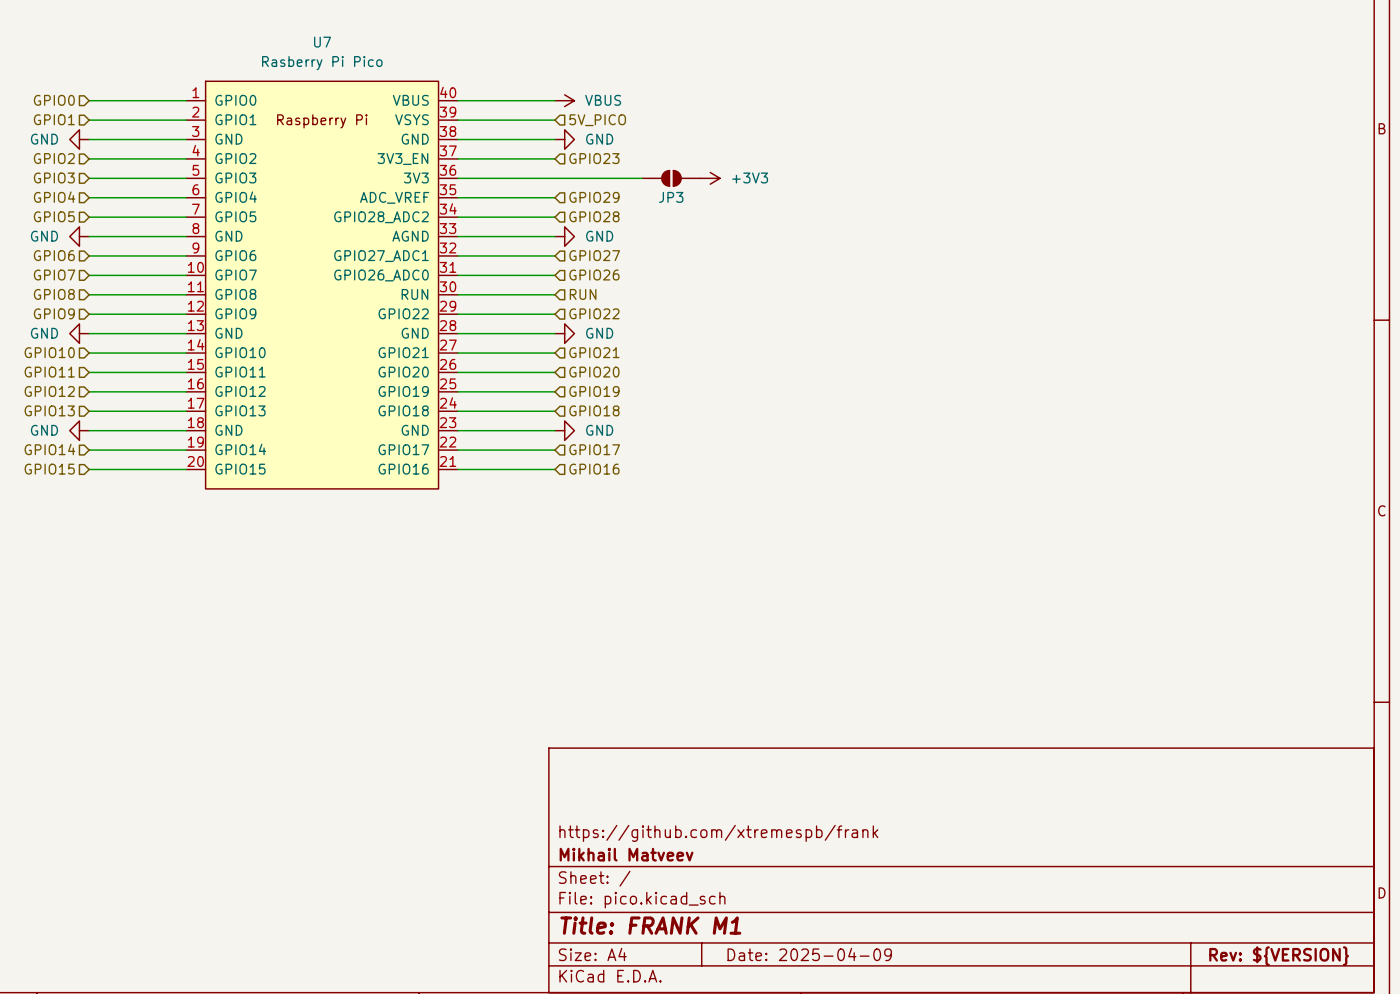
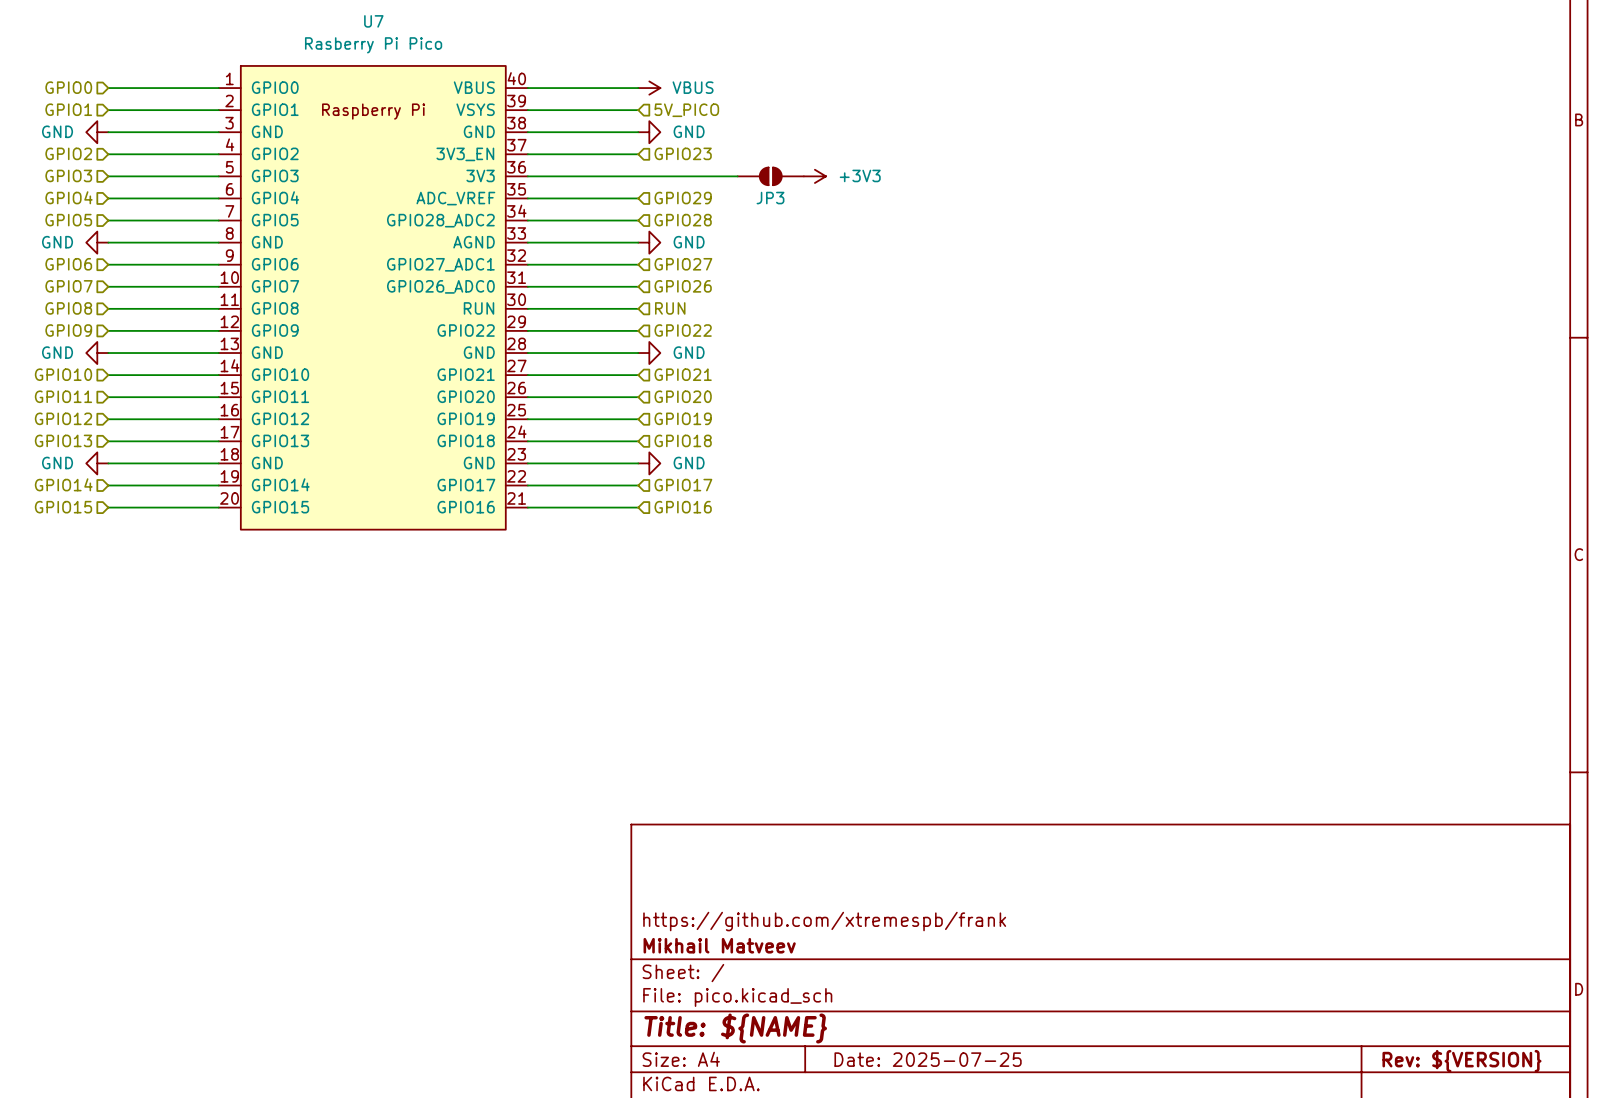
title block: Title: FRANK M1 (650, 925) -> Title: ${NAME} (735, 1028)
title block: Date: 2025-04-09 (809, 954) -> Date: 2025-07-25 (928, 1059)

